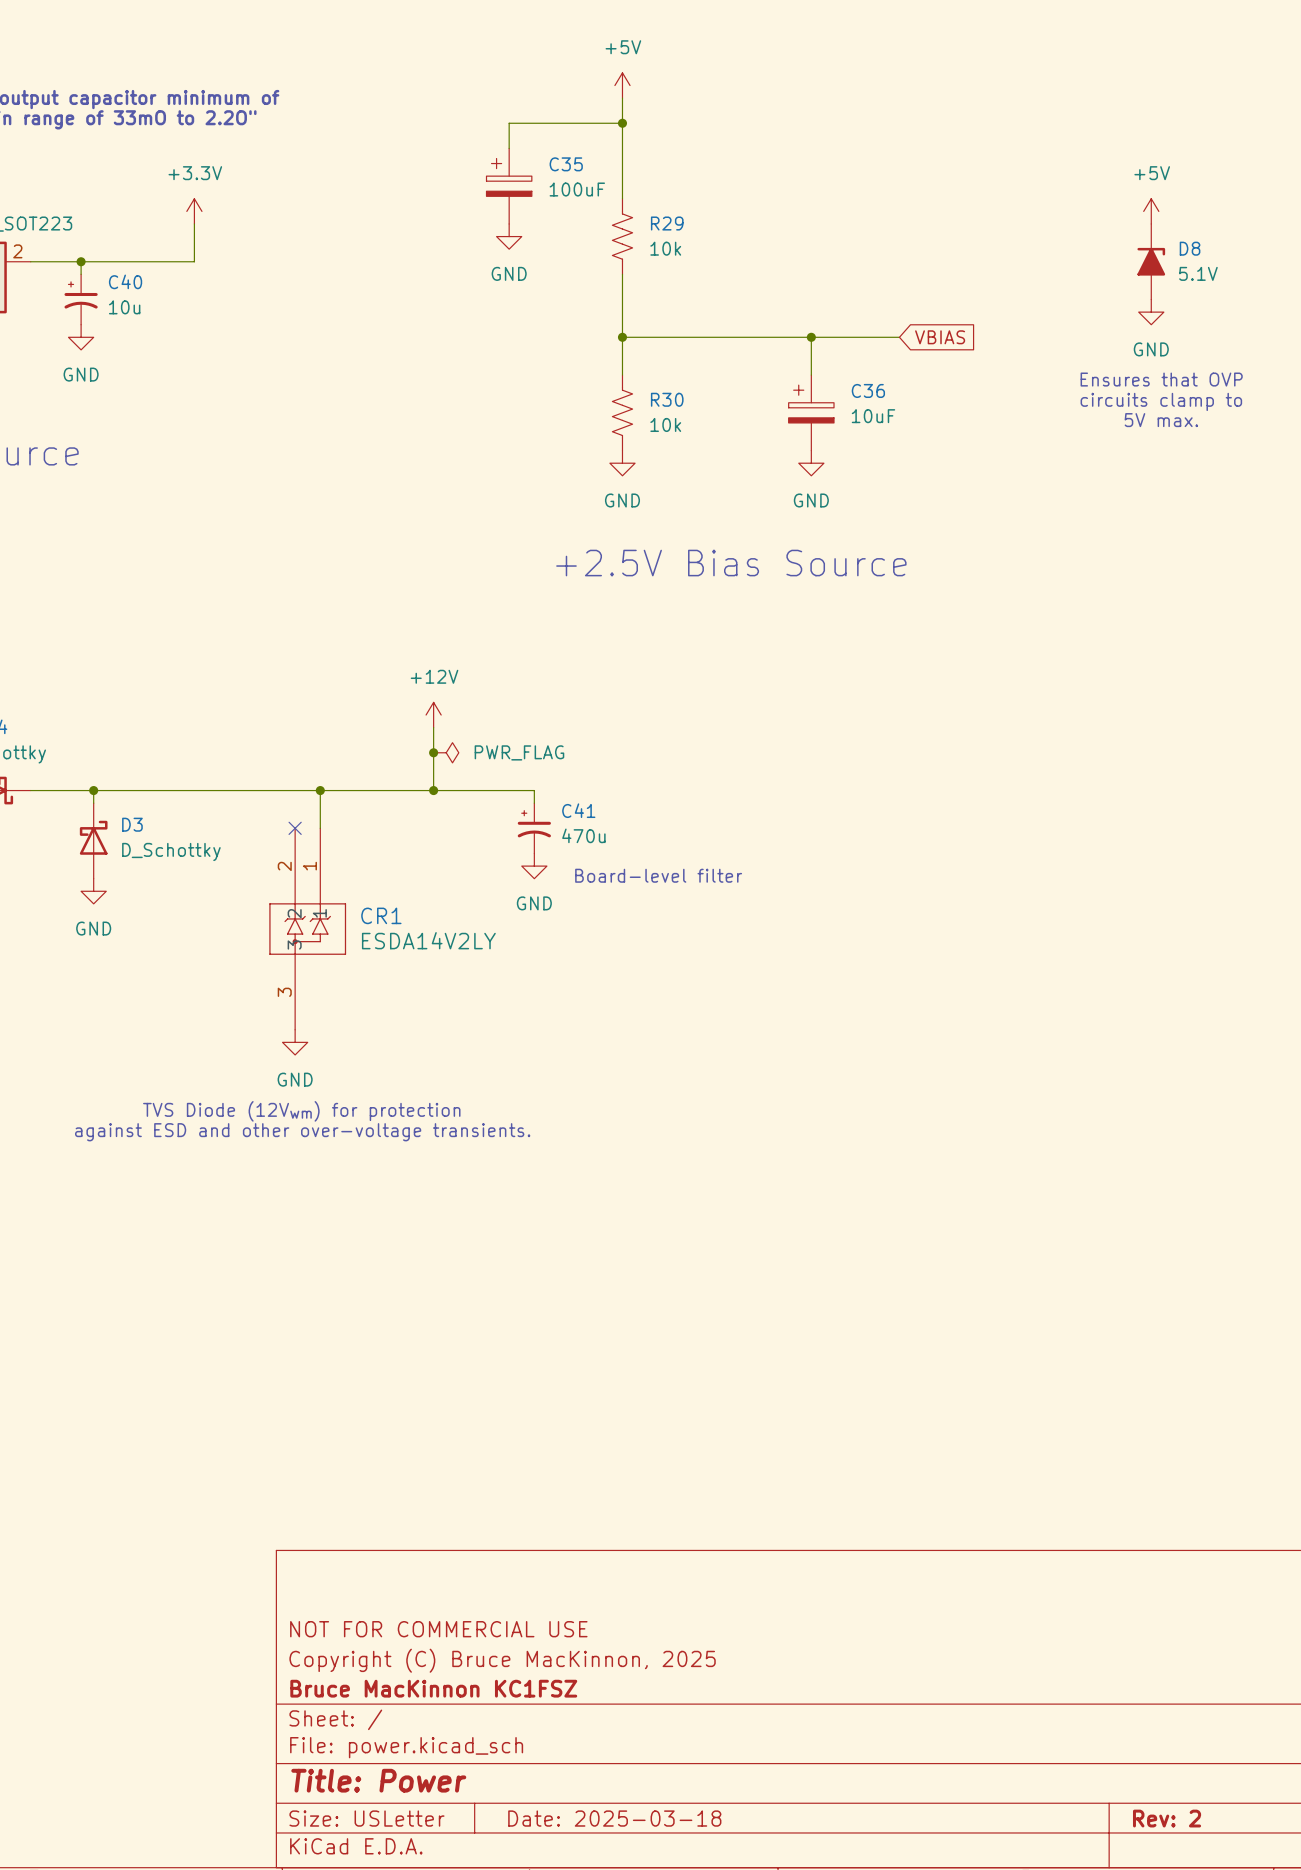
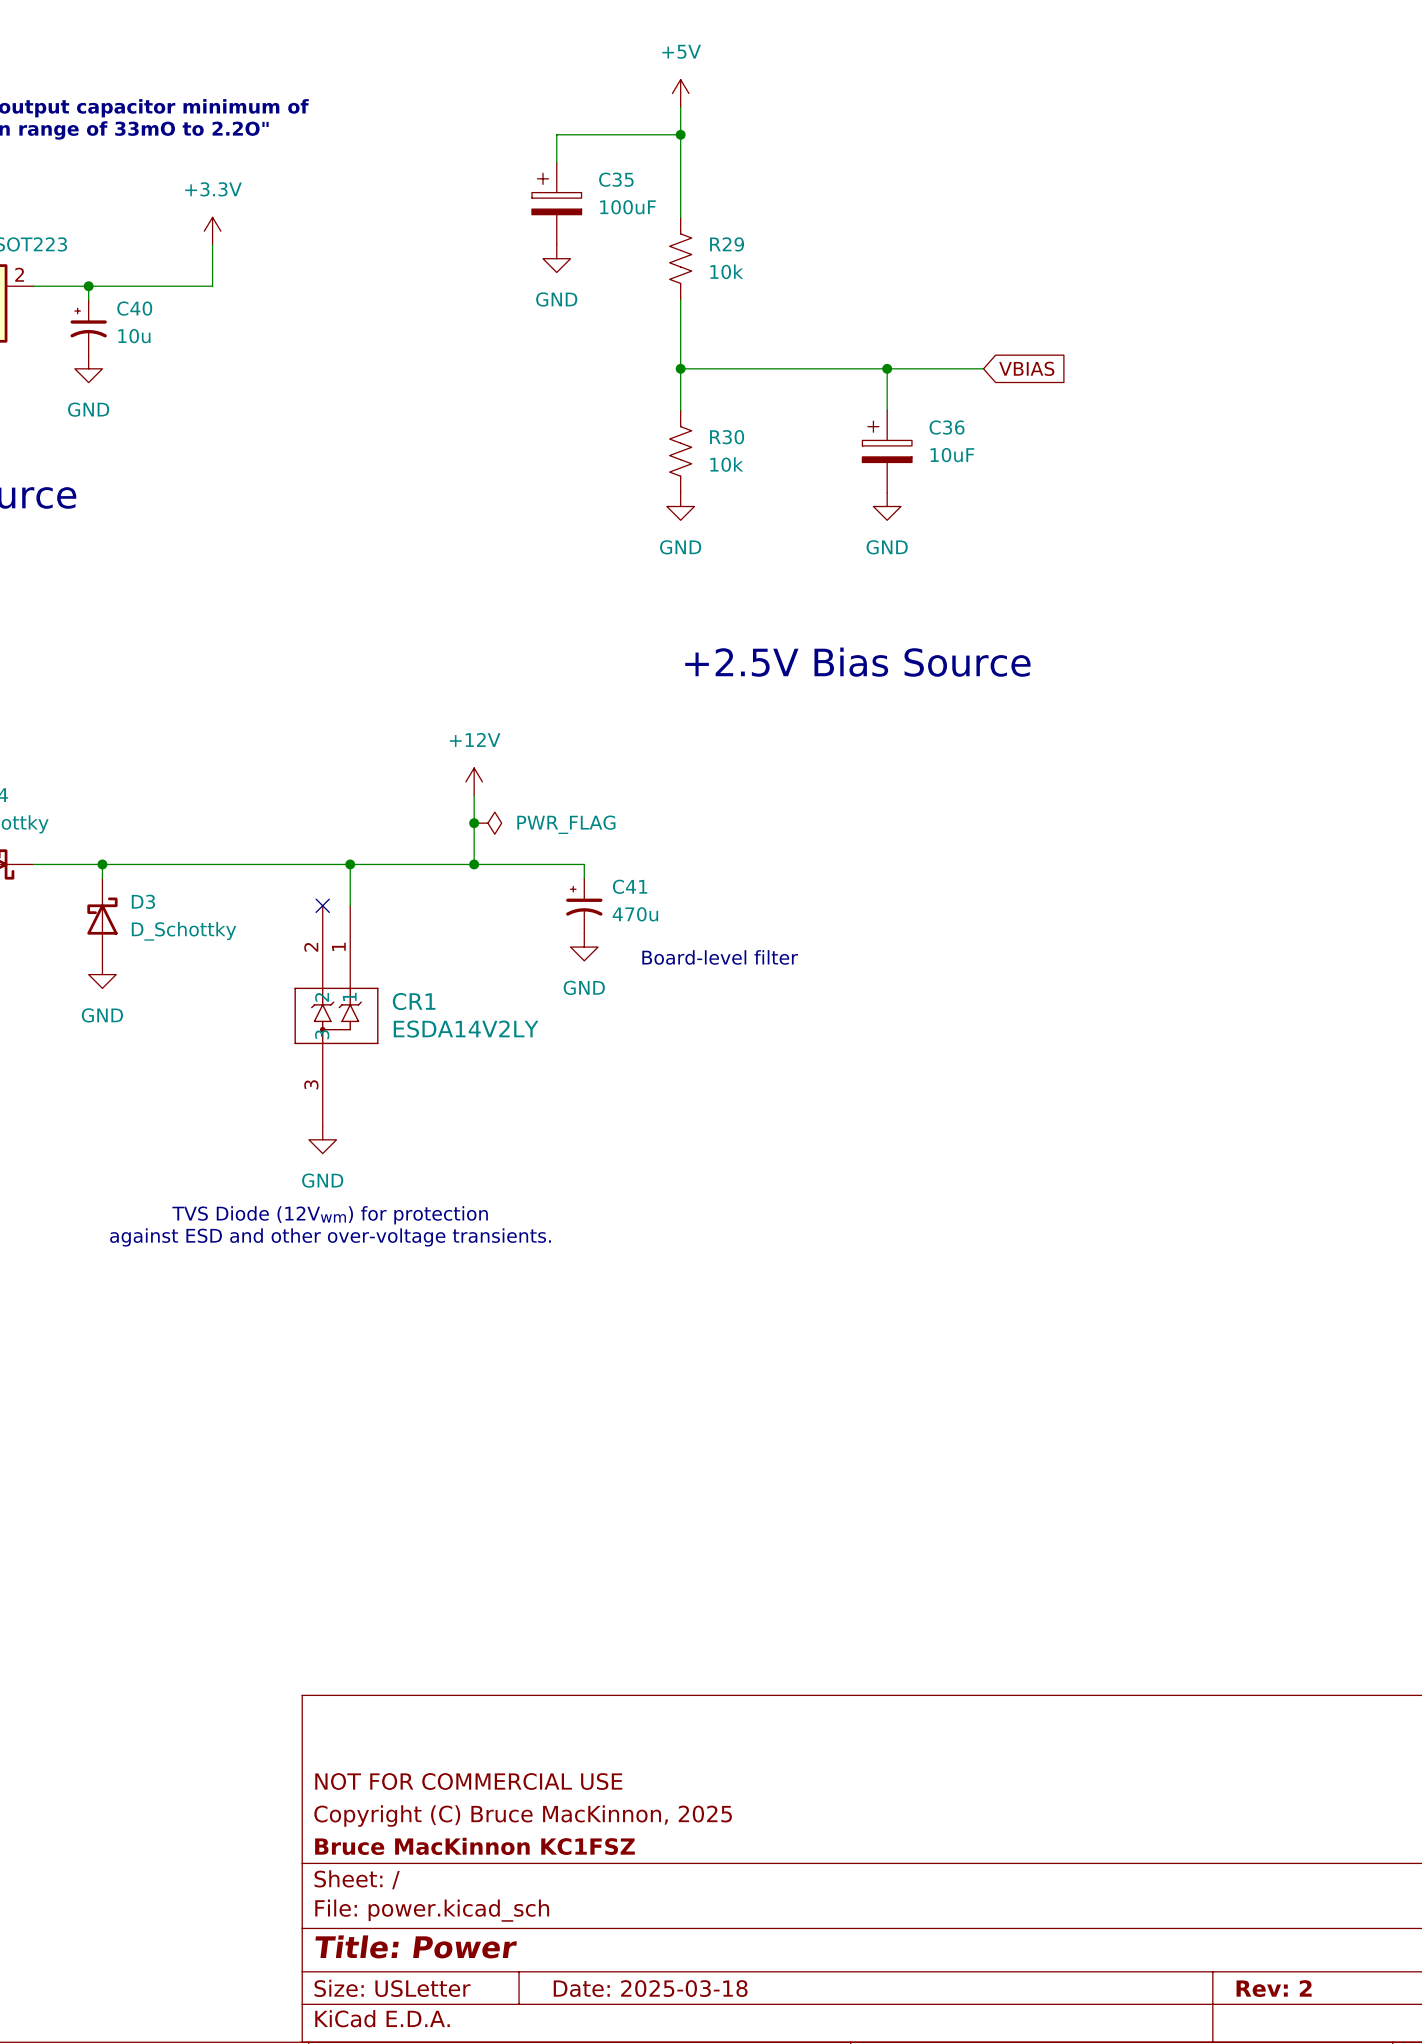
power symbol: +5V (1151, 211) -> none
D8: 5.1V (1151, 261) -> none
power symbol: GND (1151, 312) -> none
text: Ensures that OVP (1161, 379) -> none
text: circuits clamp to (1161, 401) -> none
text: 5V max. (1161, 420) -> none
text position: +2.5V Bias Source (731, 563) -> +2.5V Bias Source (857, 662)

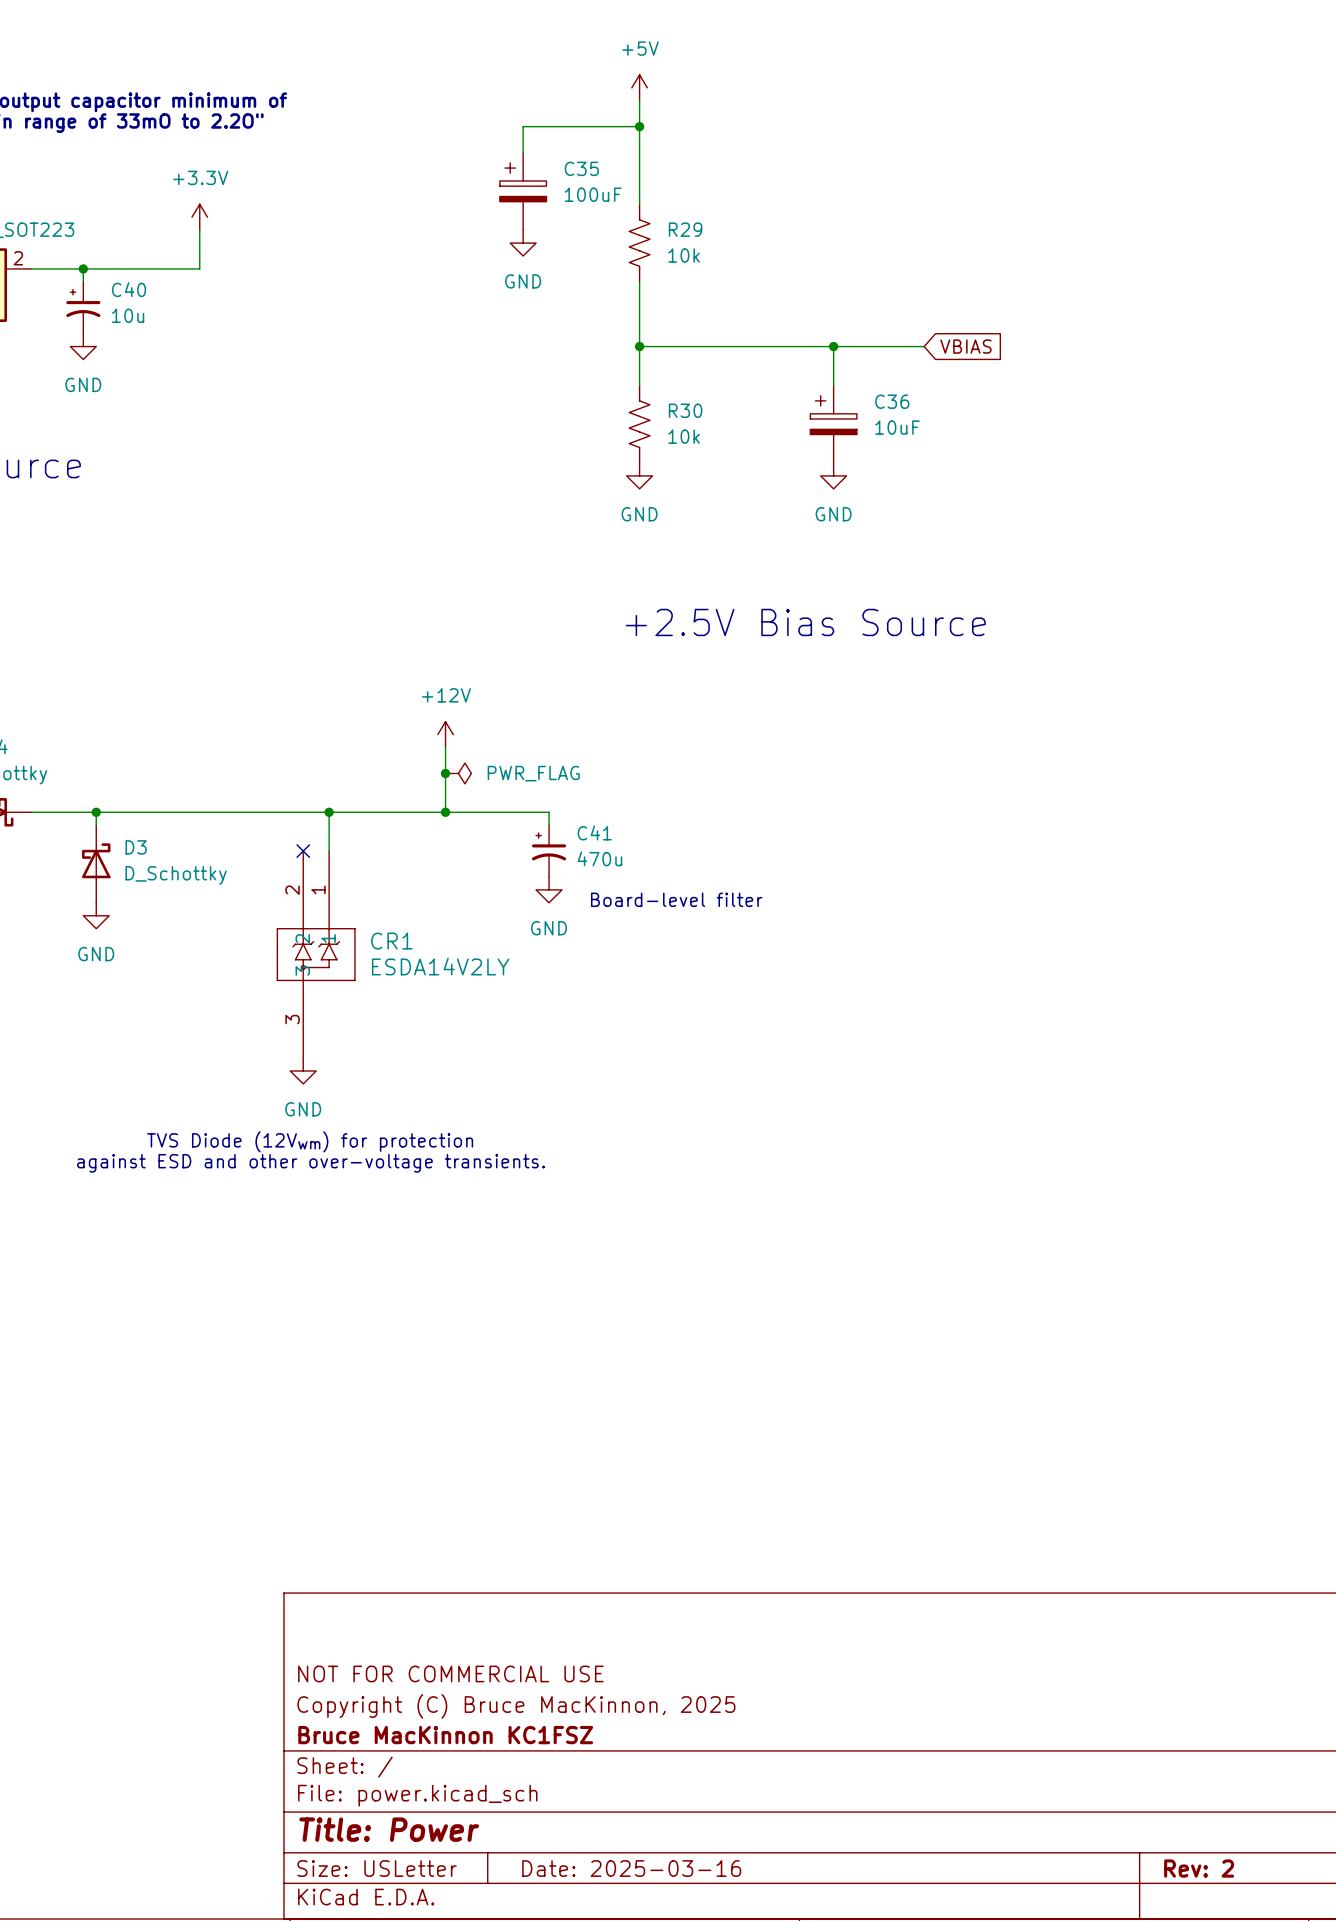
title block: Date: 2025-03-18 (650, 1988) -> Date: 2025-03-16 (631, 1868)

